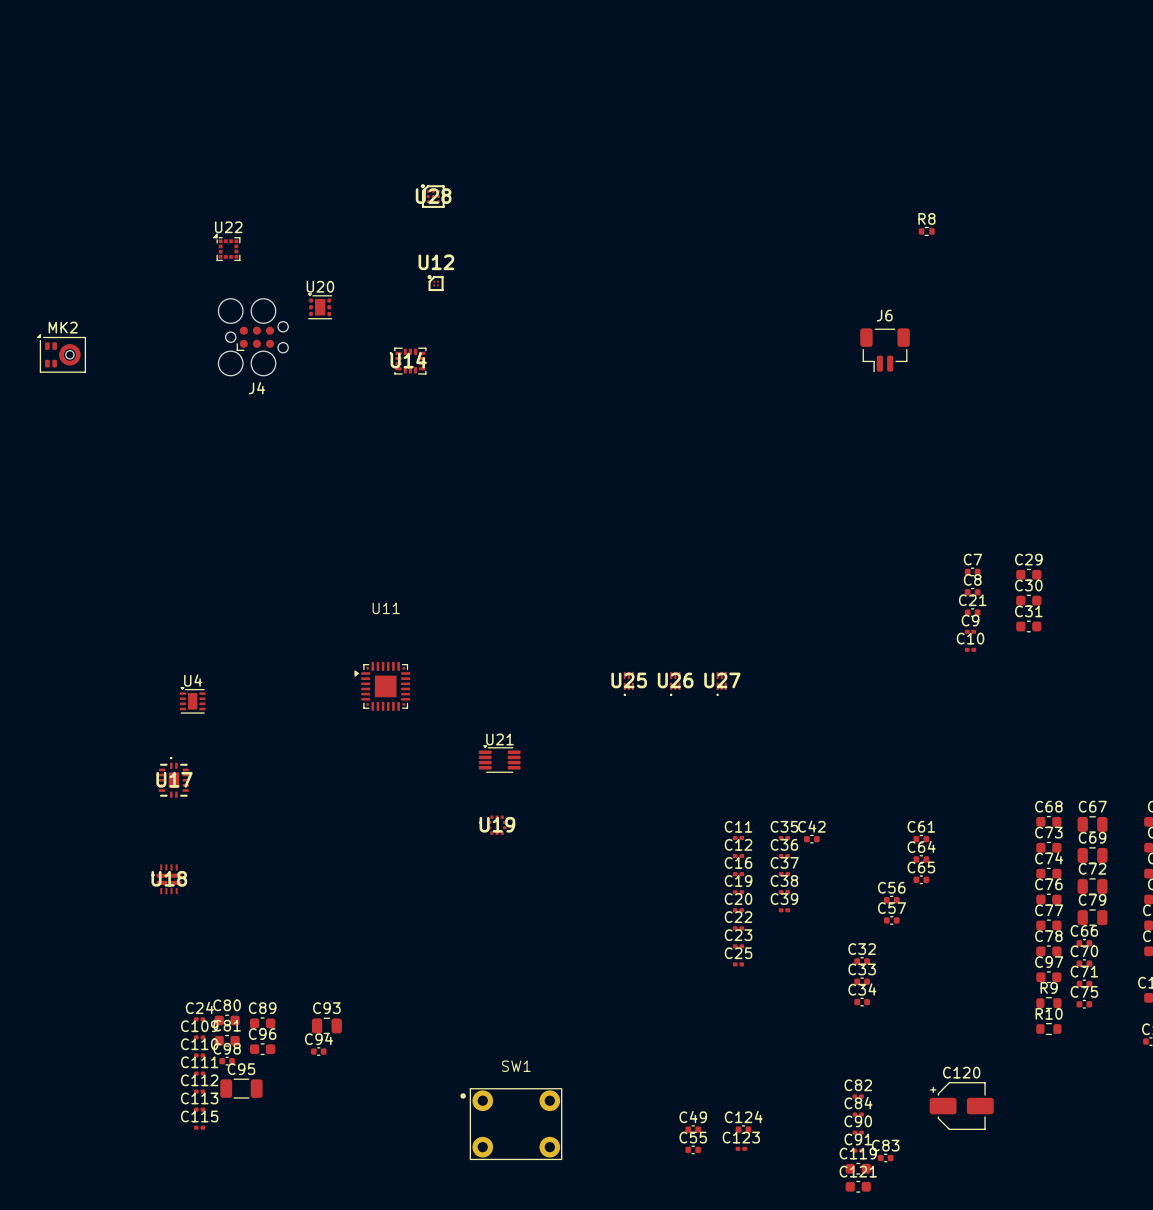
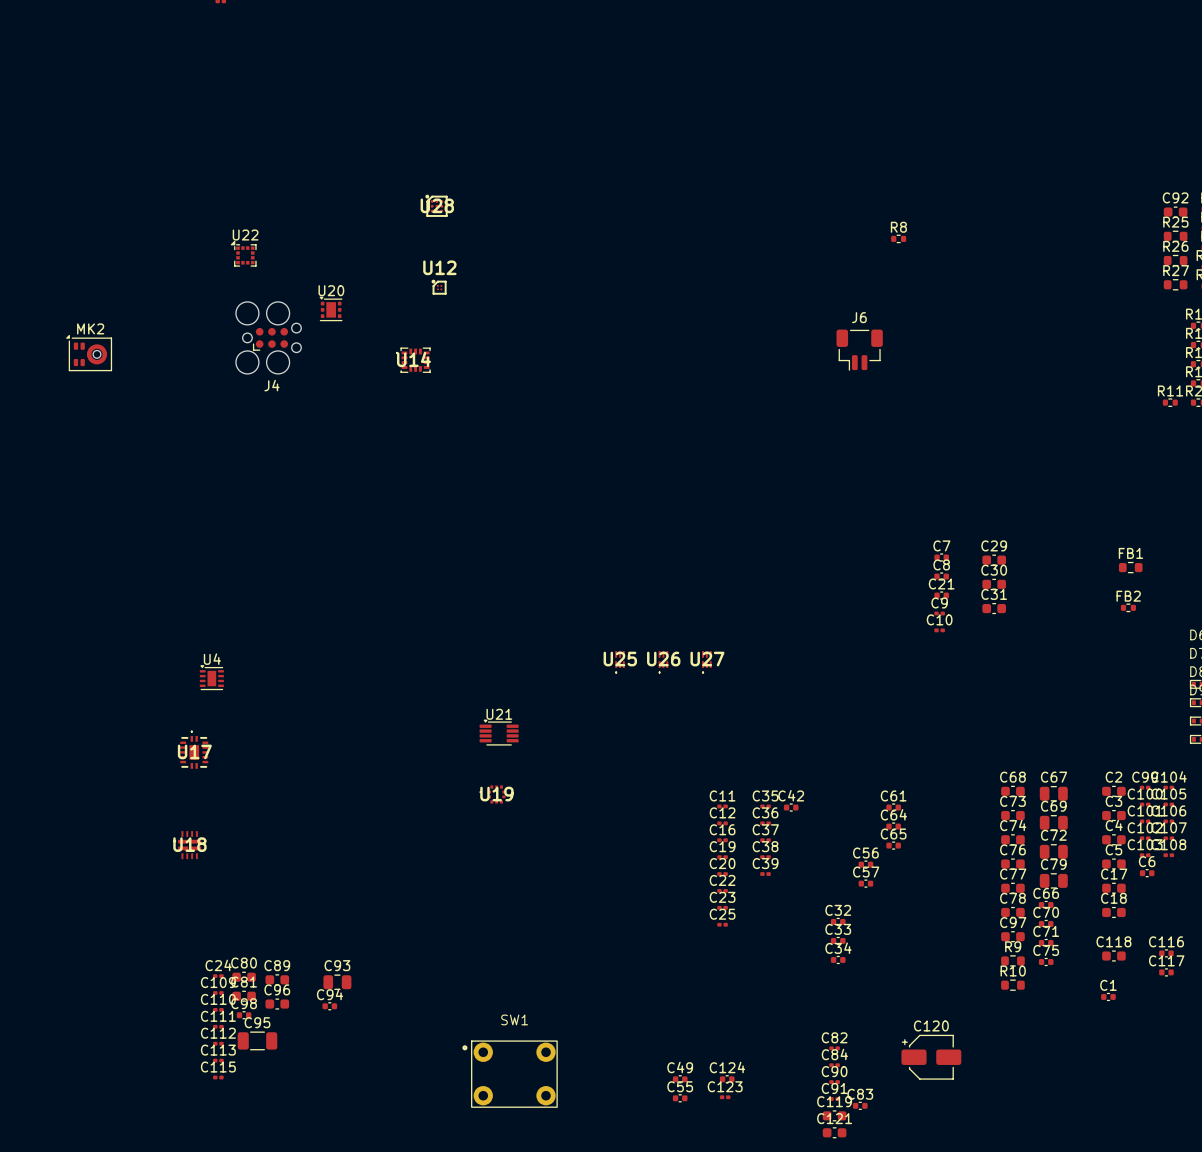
U11: (382, 686) -> none

